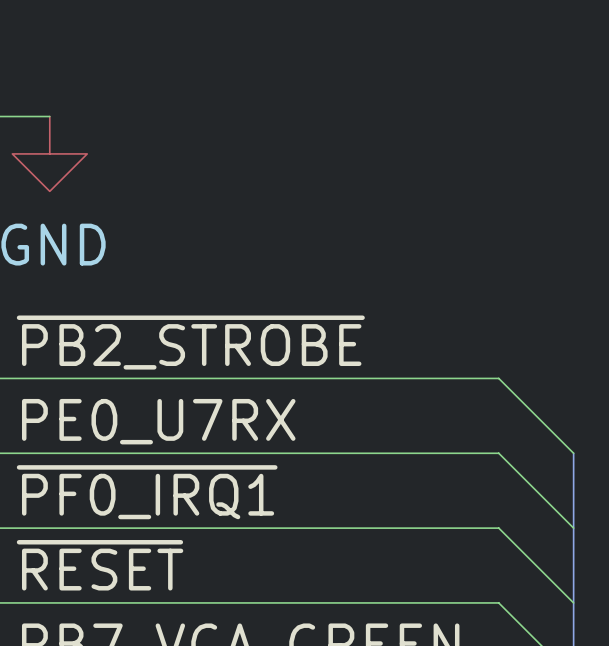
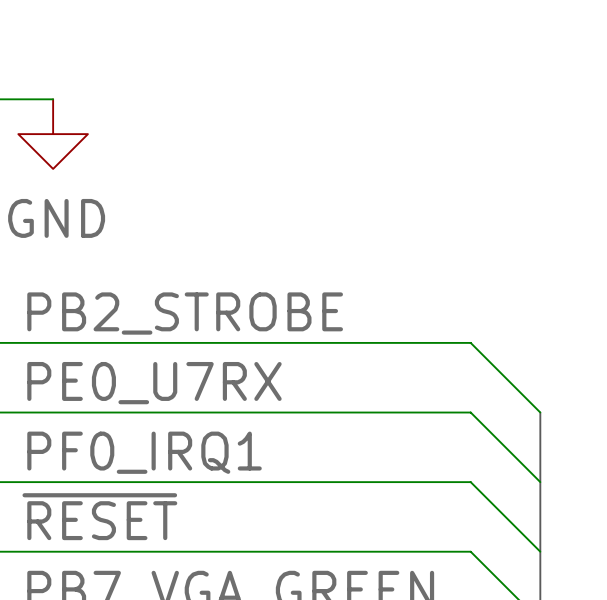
label: ~{PB2_STROBE} (190, 342) -> PB2_STROBE (185, 313)
label: ~{PF0_IRQ1} (147, 492) -> PF0_IRQ1 (144, 452)

